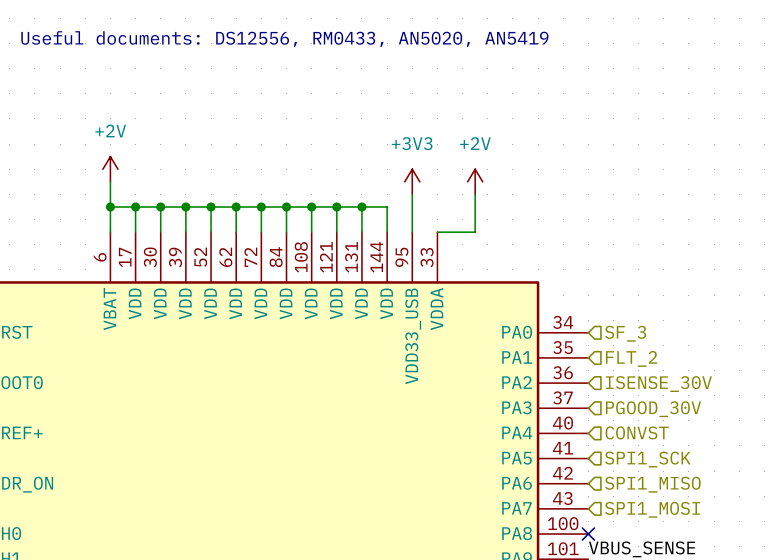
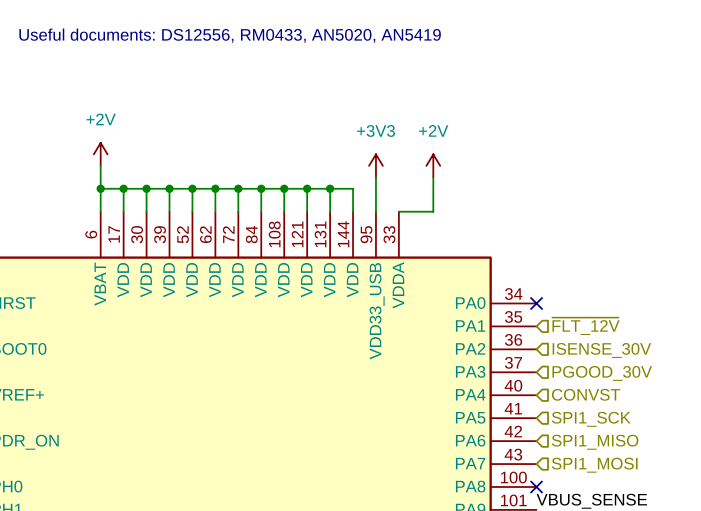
no-connect mark: none -> (536, 303)
hierarchical label: SF_3 (625, 333) -> none
hierarchical label: FLT_2 (631, 358) -> ~{FLT_12V} (585, 326)

